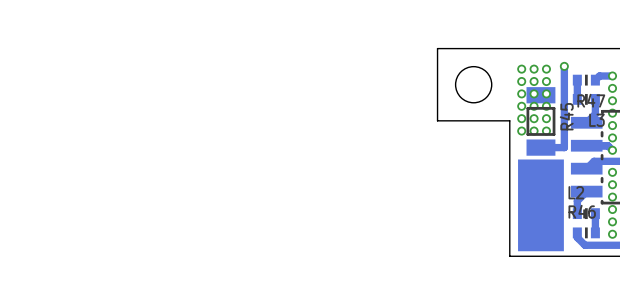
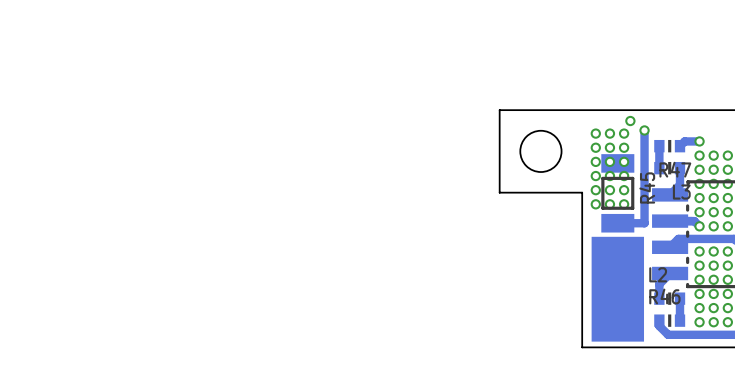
via: none -> (630, 121)

